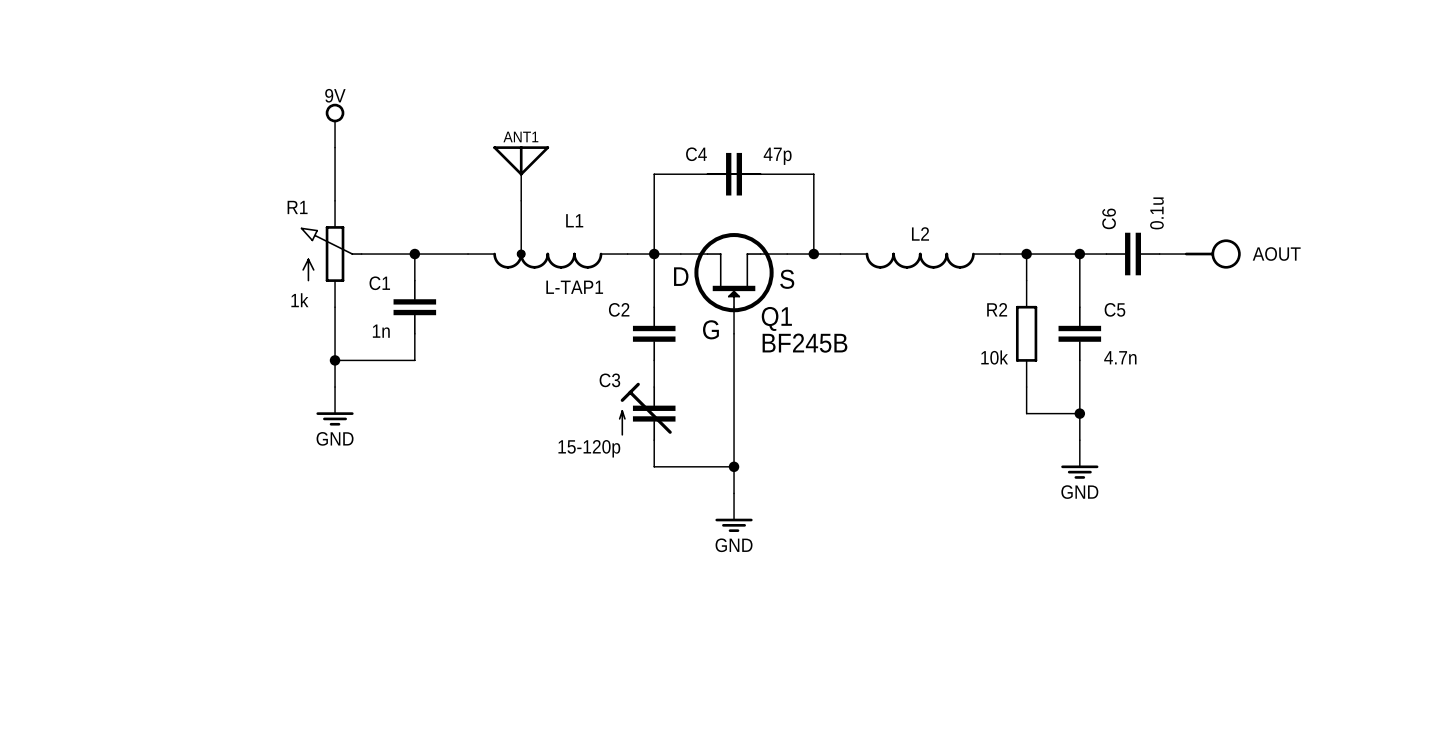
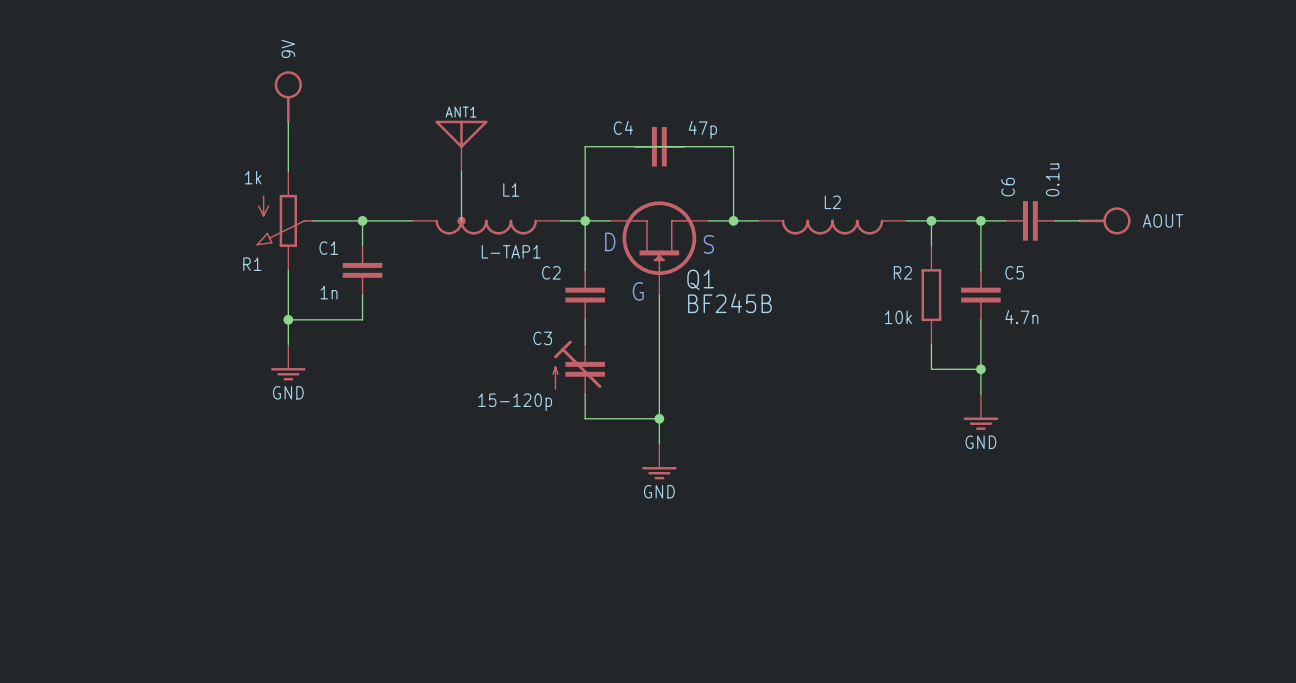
9V: none -> (288, 97)
power symbol: 9V (335, 125) -> none
R1 flip: as is (331, 254) -> up-down (285, 220)

